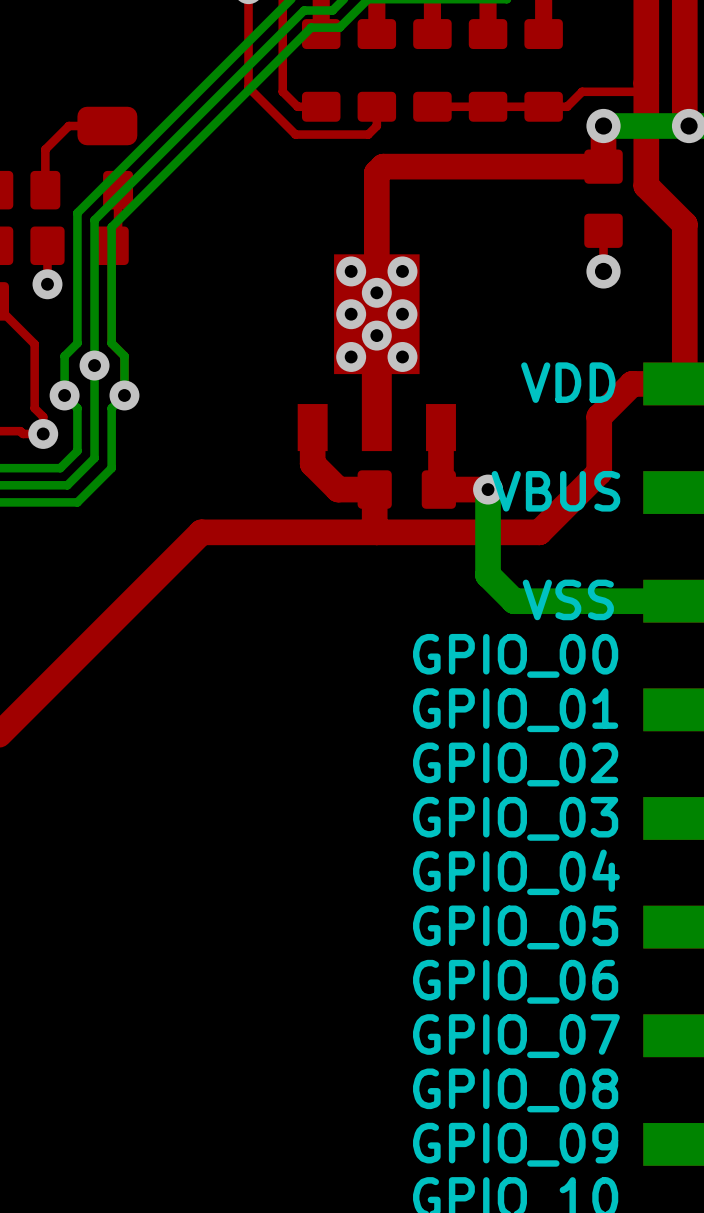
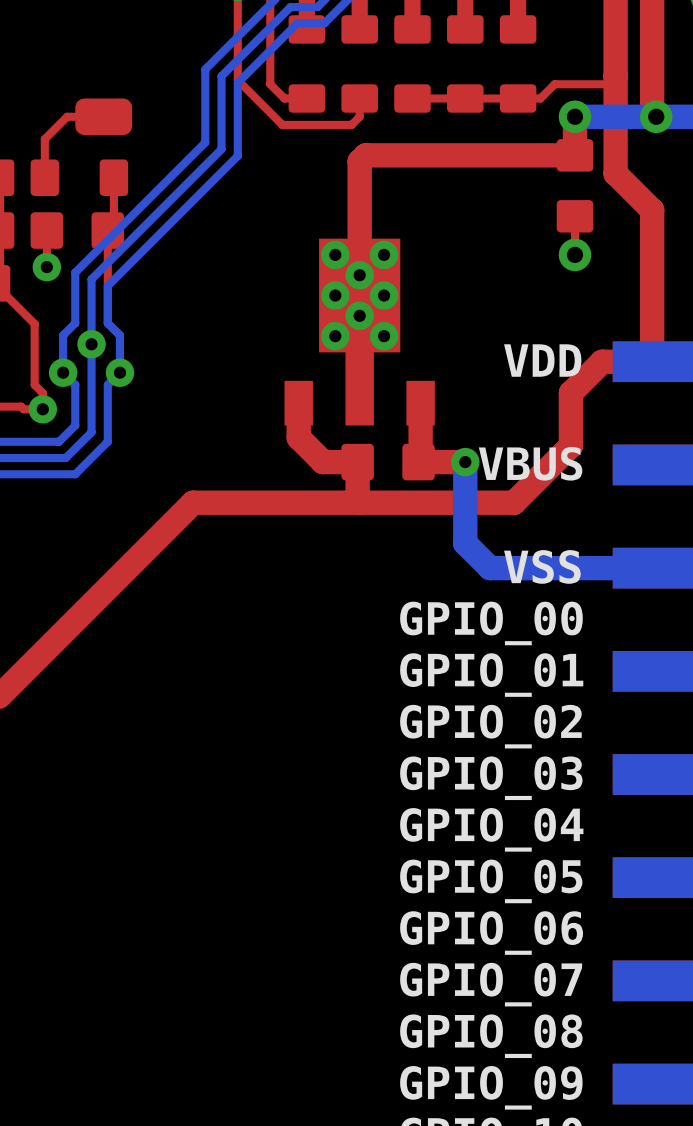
bottom track: (214, 76) (77, 213) (77, 290) -> (205, 69) (205, 142) (75, 272)
bottom track: (231, 83) (94, 220) (94, 297) -> (221, 76) (221, 149) (91, 279)
bottom track: (248, 90) (111, 227) (111, 304) -> (237, 82) (237, 156) (107, 286)

